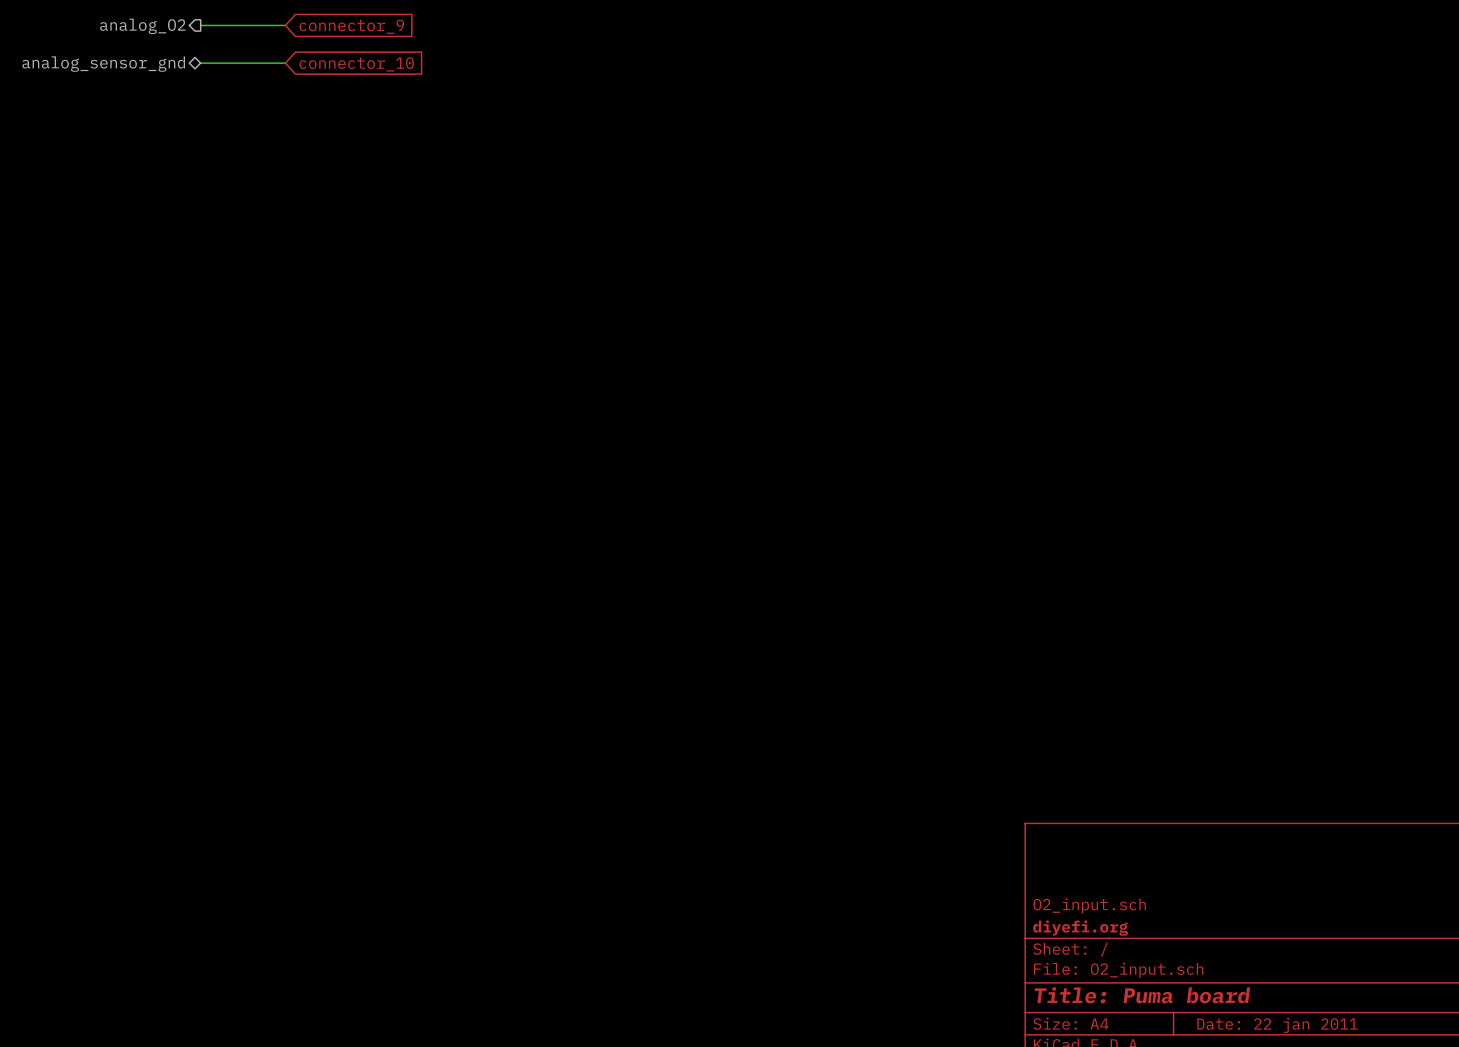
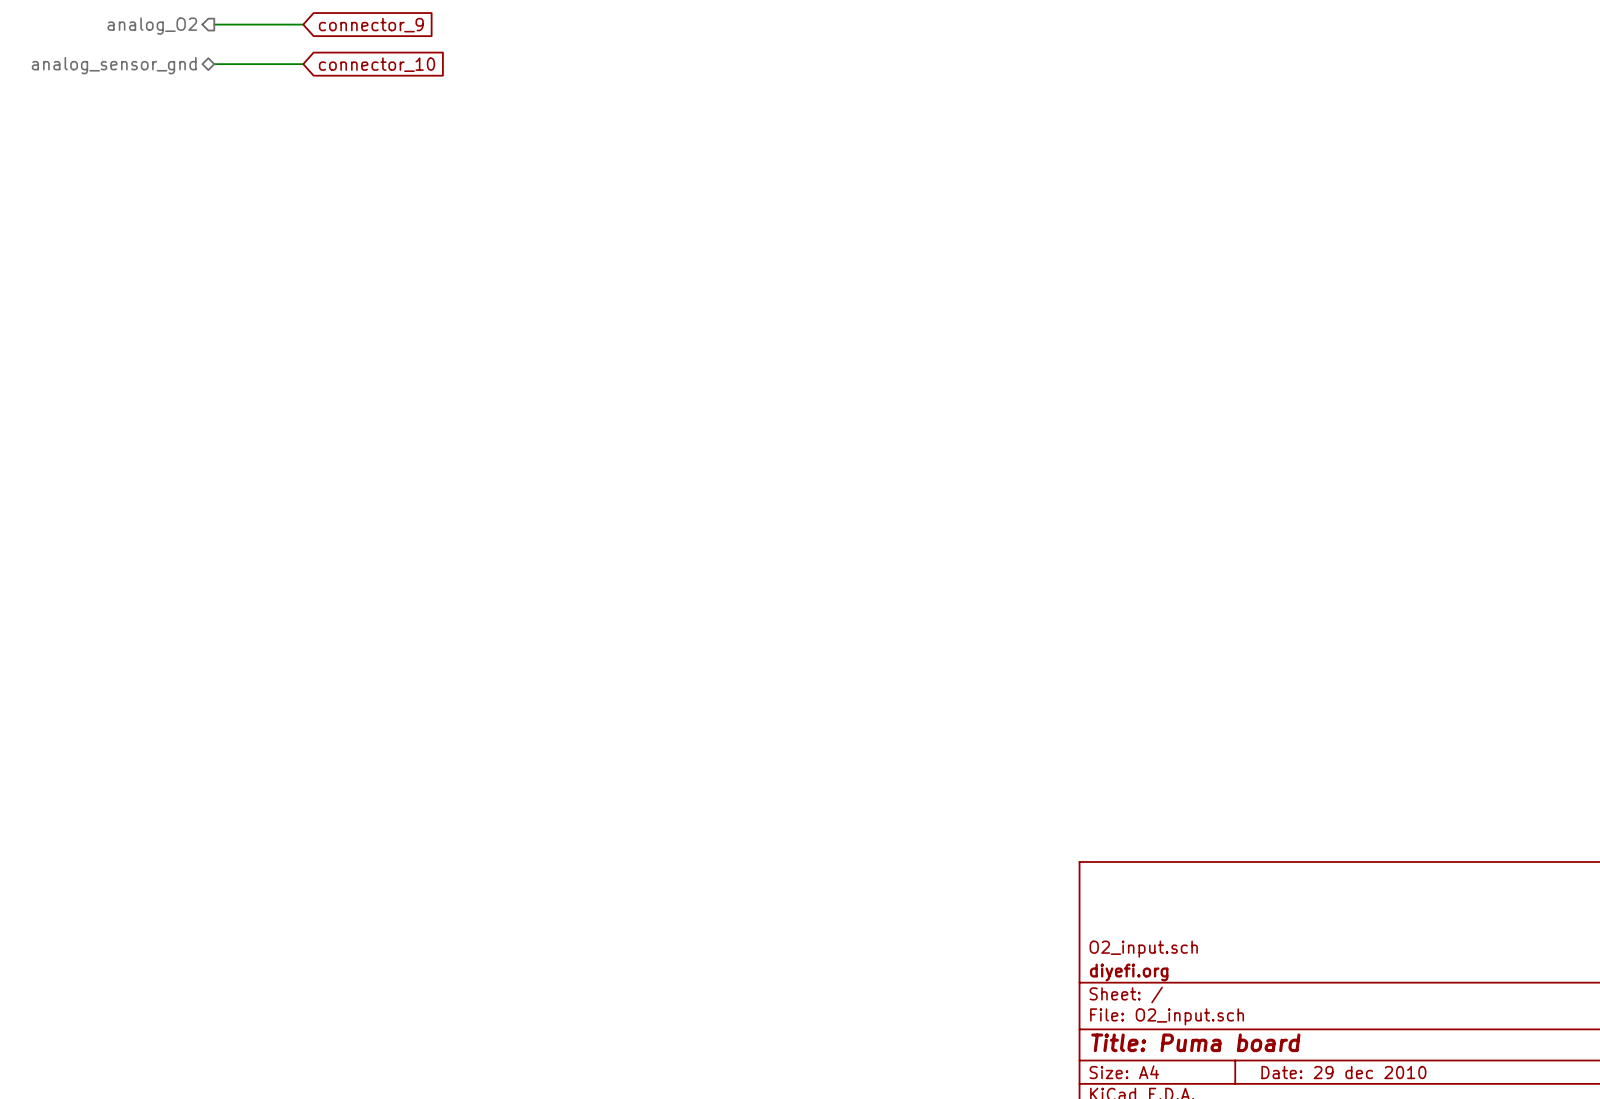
title block: Date: 22 jan 2011 (1277, 1025) -> Date: 29 dec 2010 (1343, 1072)

